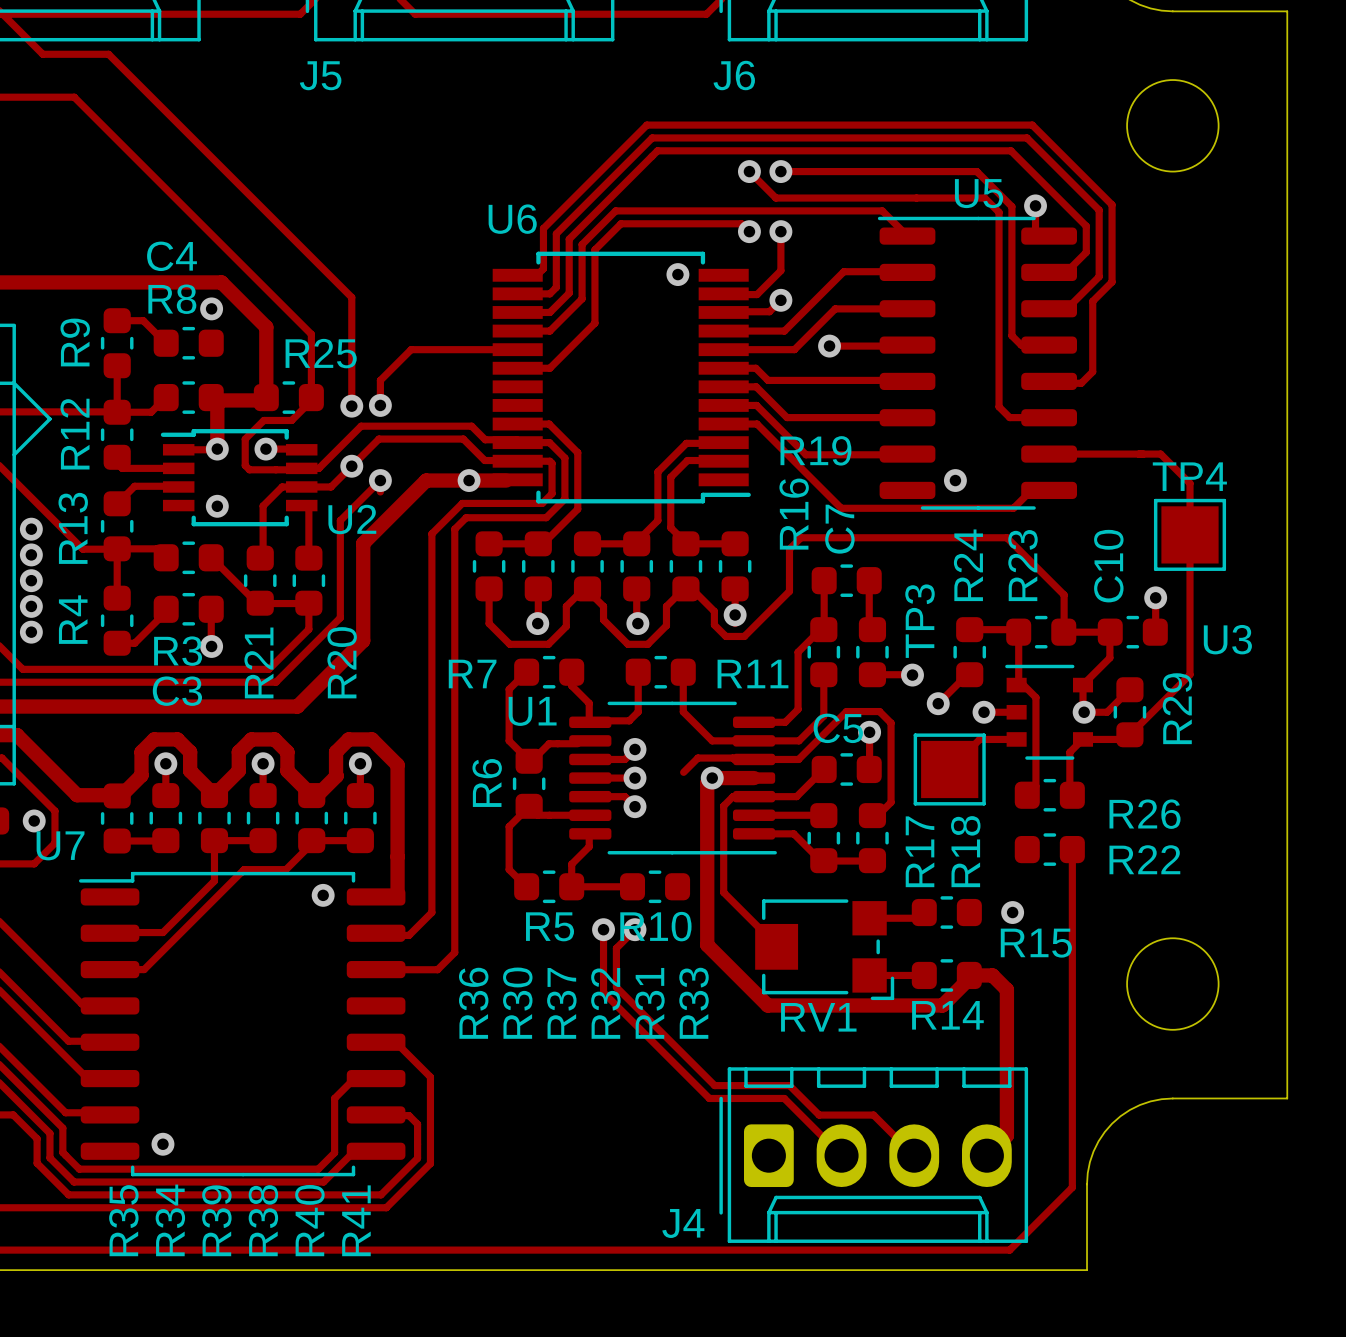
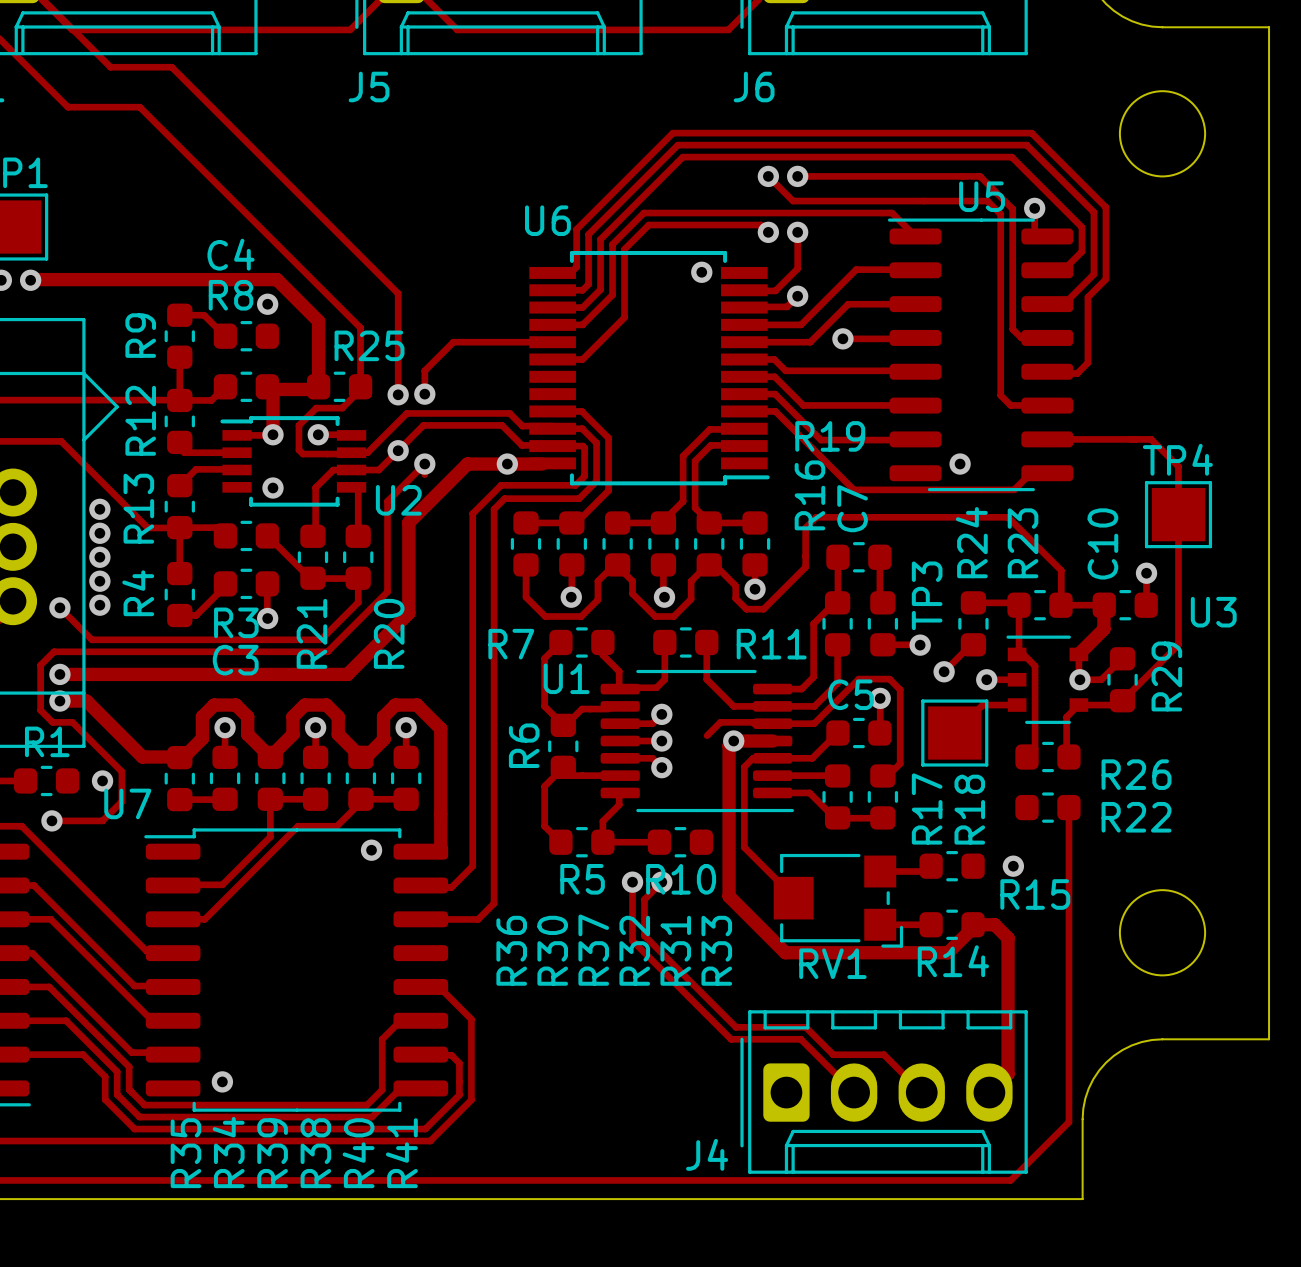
track width: thin (1109, 637) (1109, 657) (1083, 684) -> thick (1103, 610) (1103, 629) (1078, 654)

